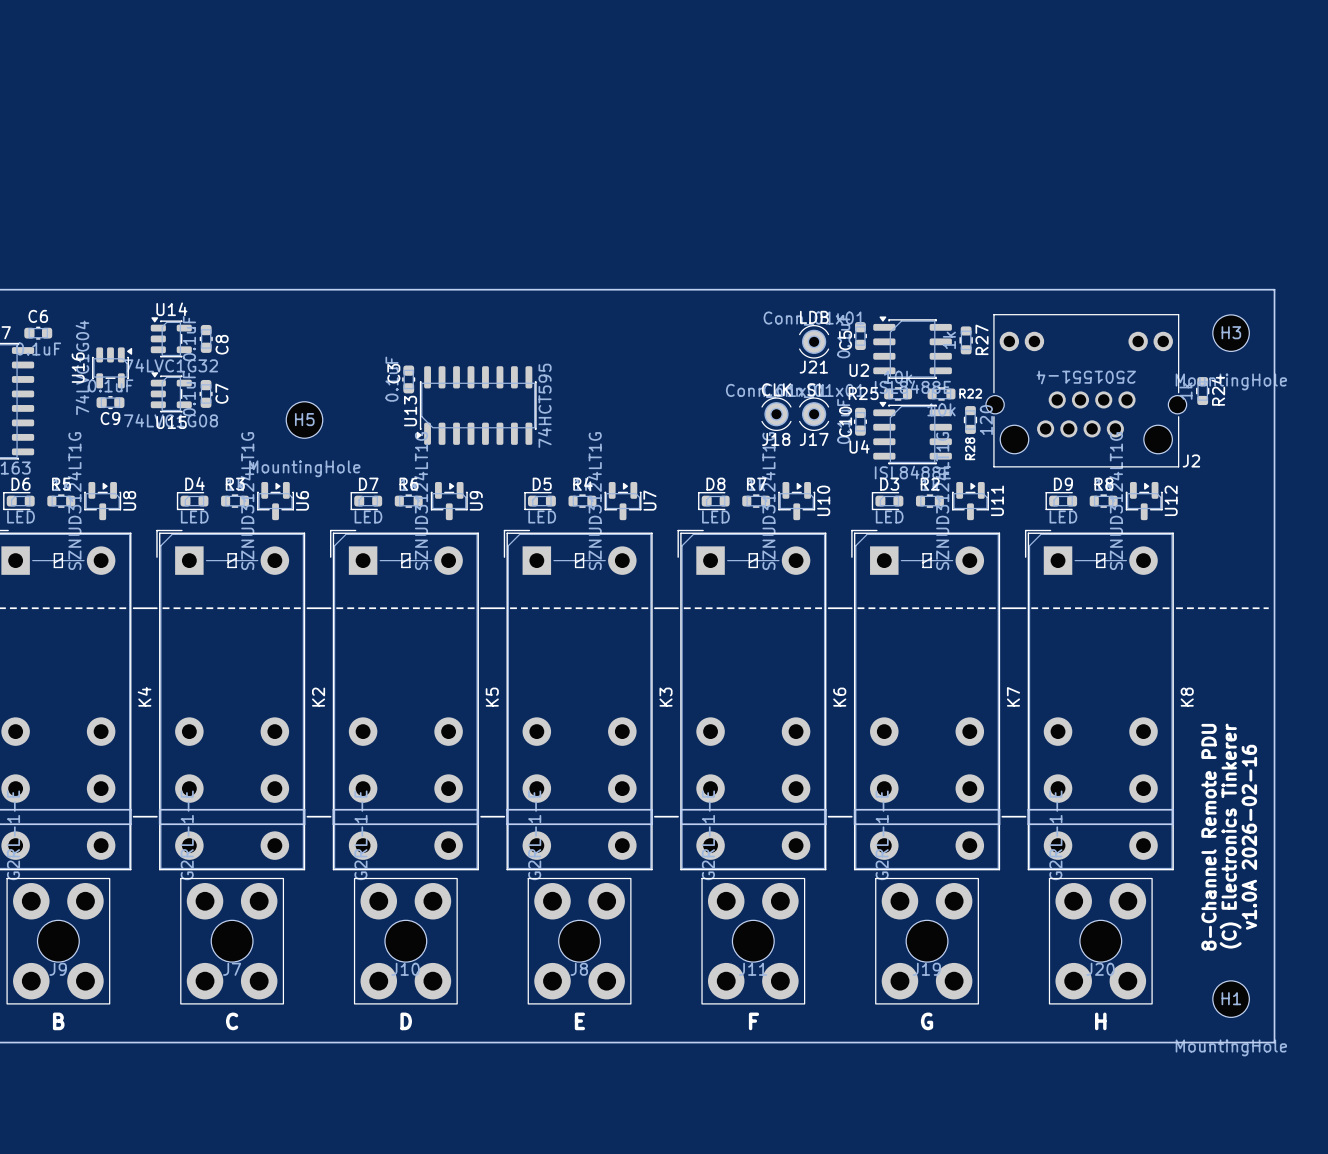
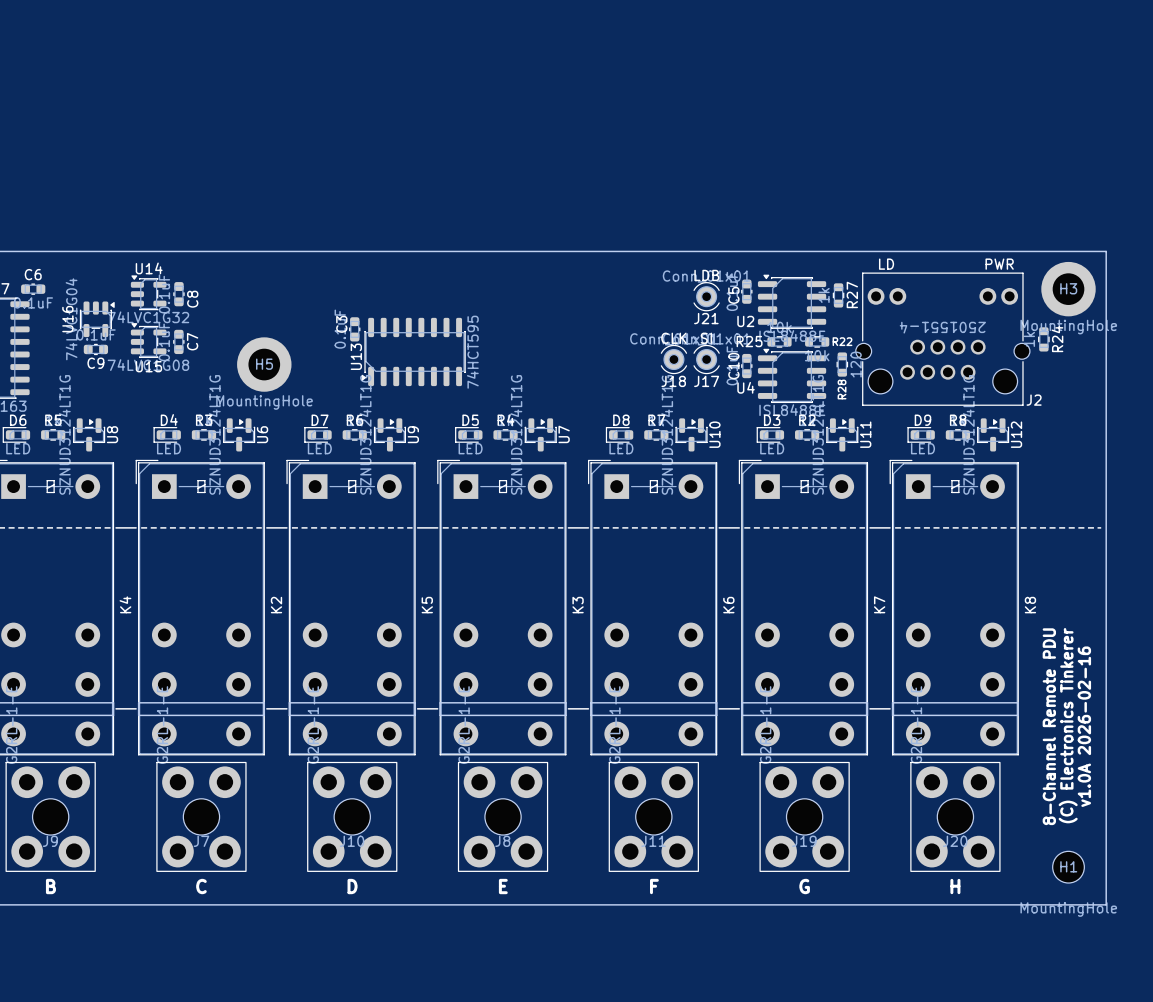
text: none -> LD (886, 264)
text: none -> PWR (999, 264)
H3 footprint: [1212, 314, 1250, 352] -> [1041, 261, 1096, 317]
H5 footprint: [286, 401, 323, 439] -> [237, 337, 292, 392]

